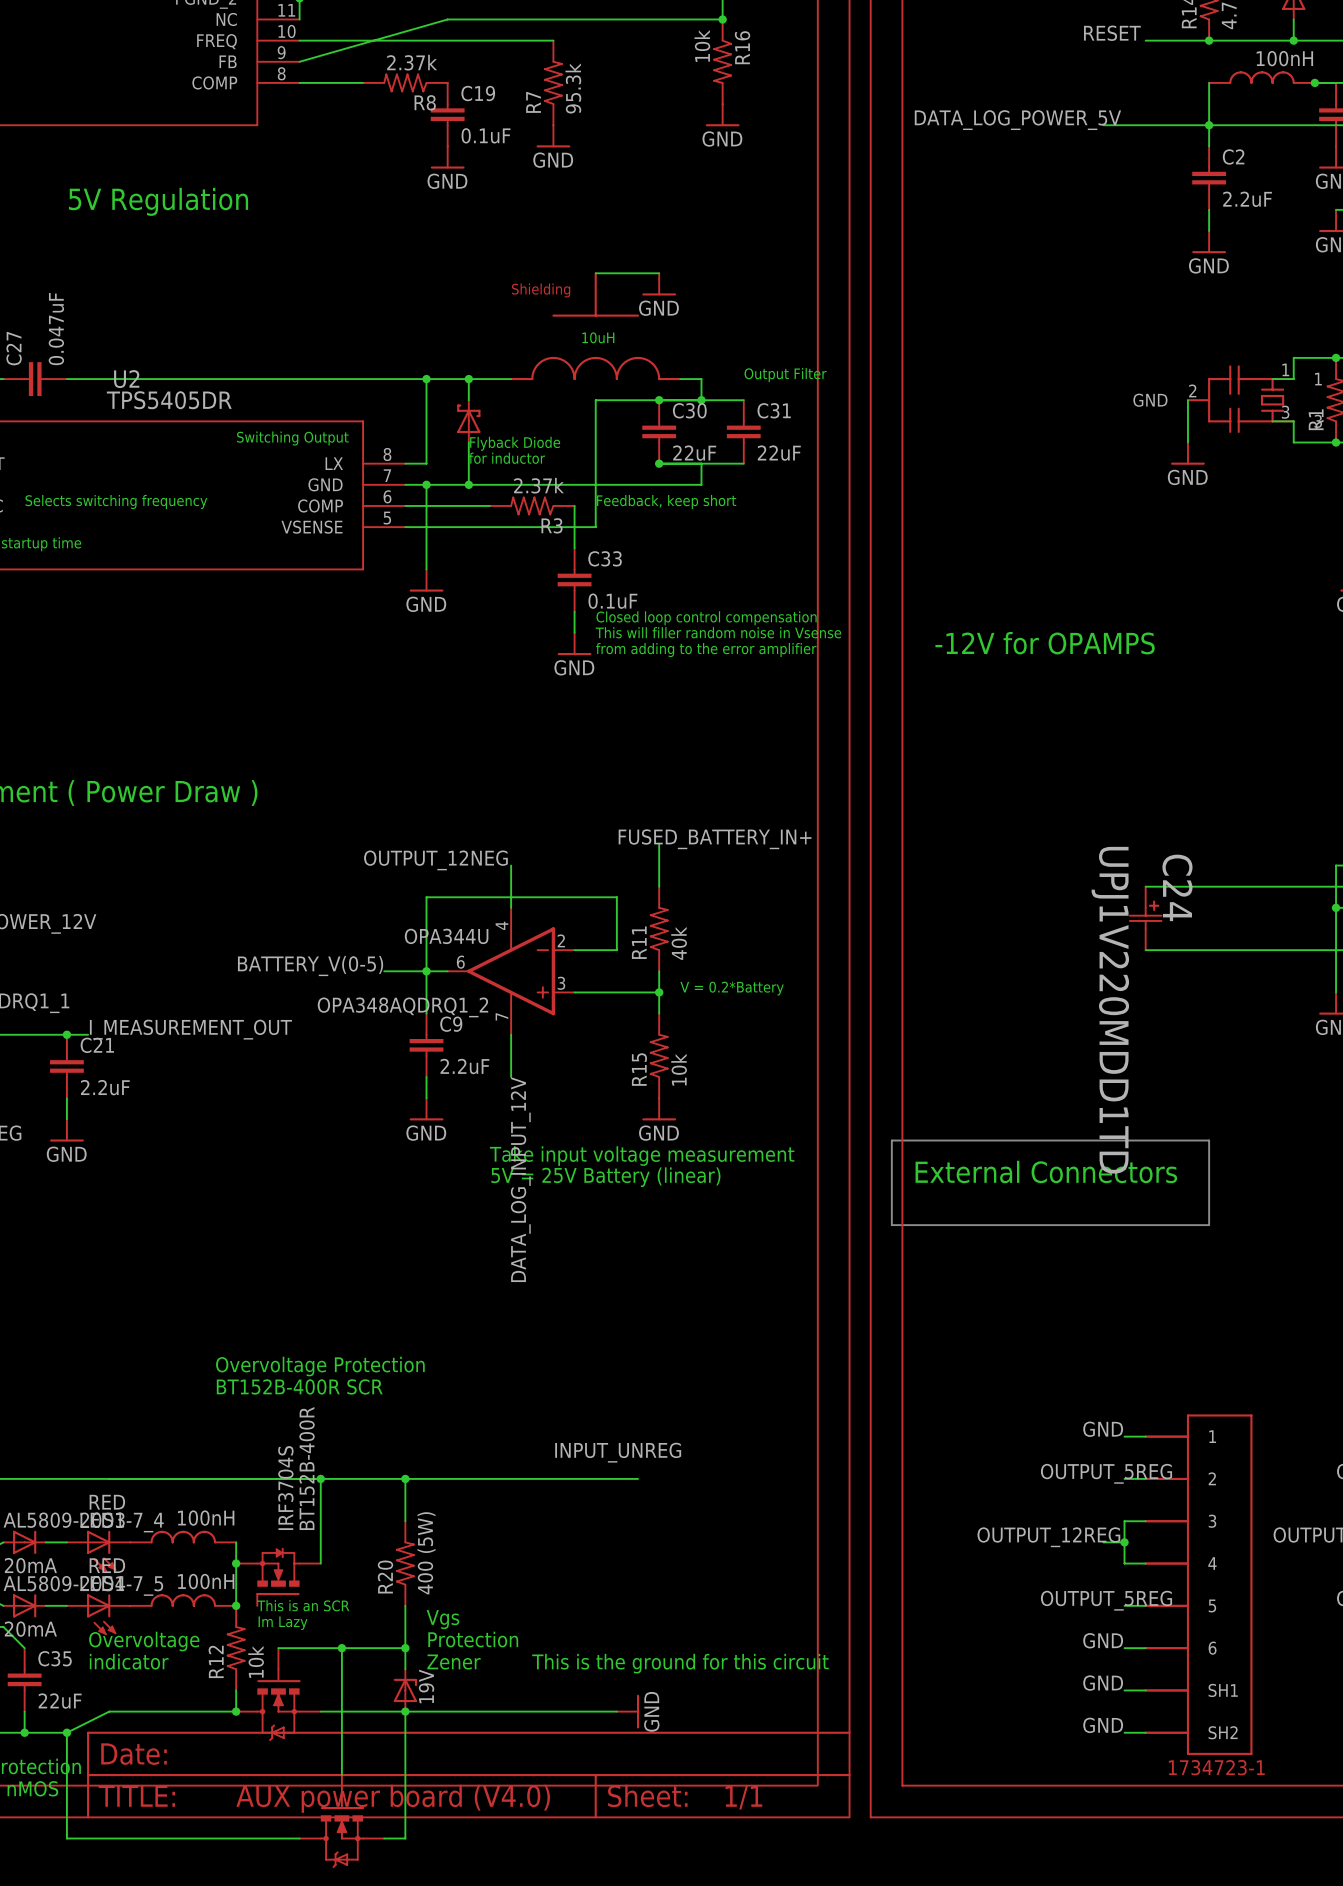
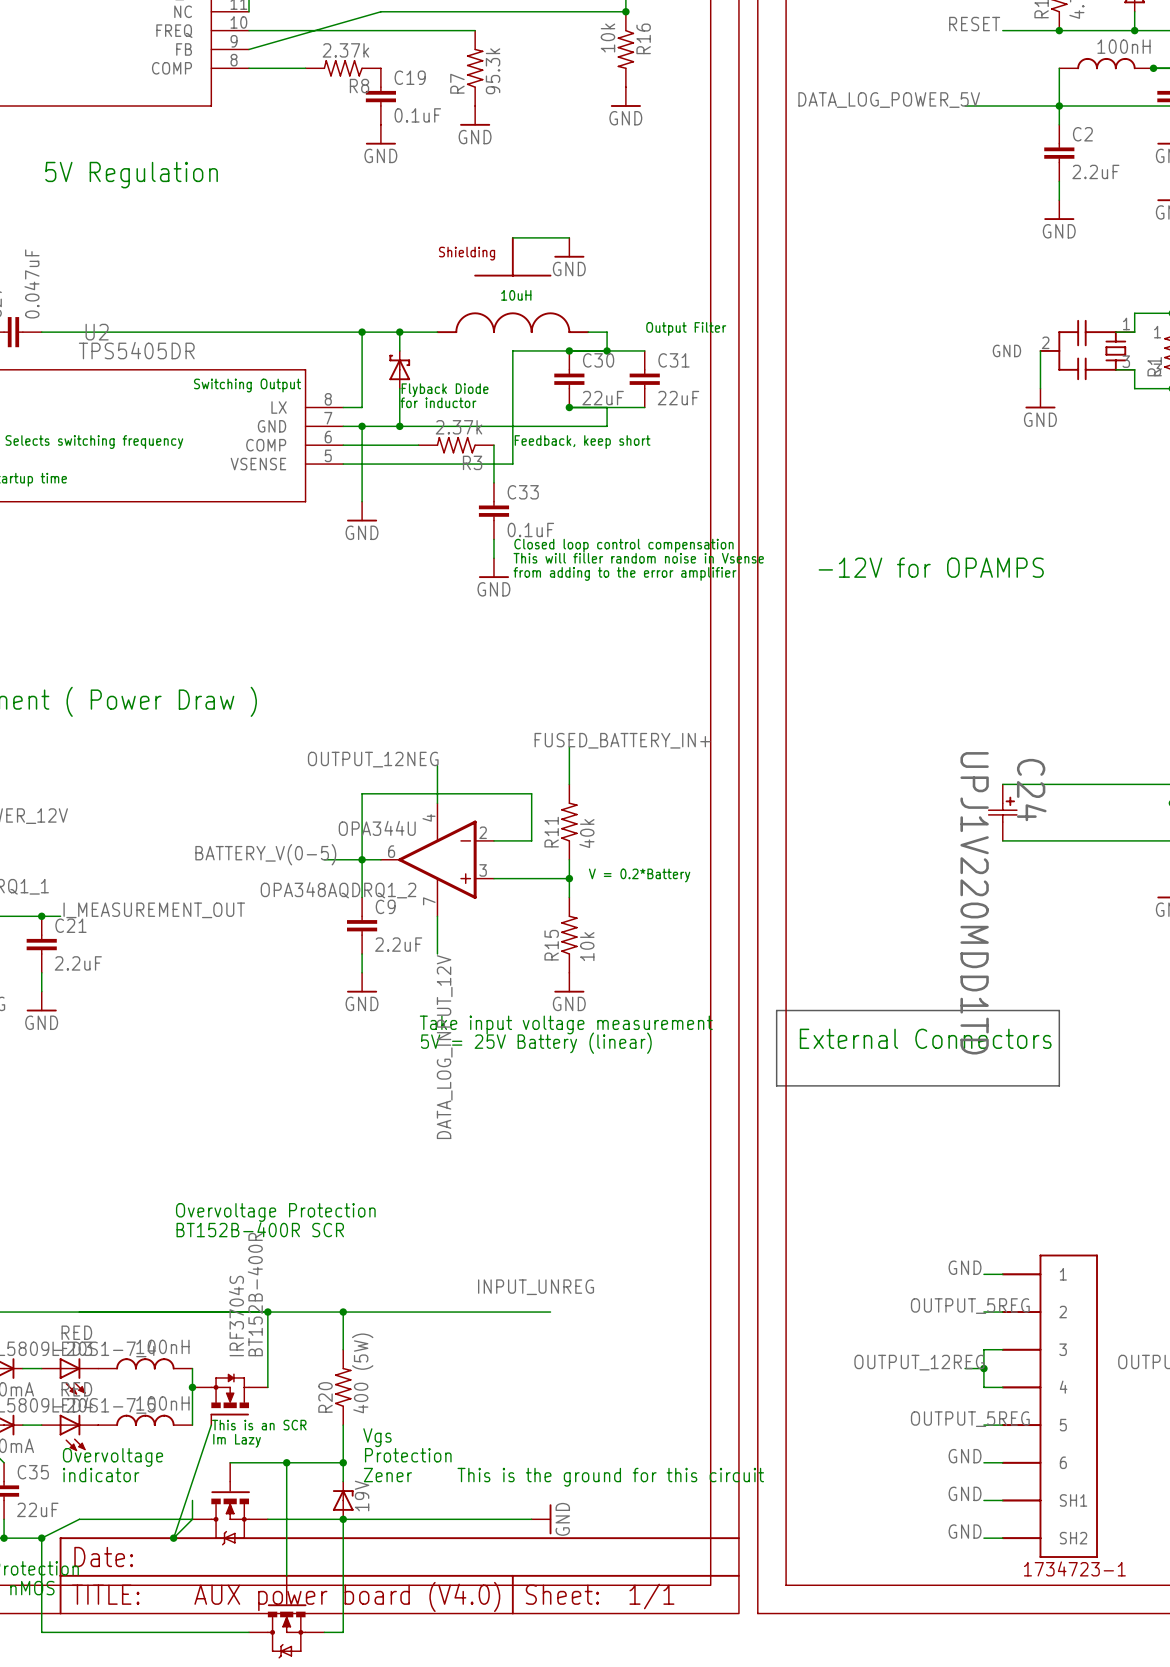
junction: (236, 1605) -> none
wire: none -> (211, 1425) (173, 1538) (192, 1519)
R12: 10k (236, 1648) -> none
junction position: (236, 1711) -> (173, 1538)

